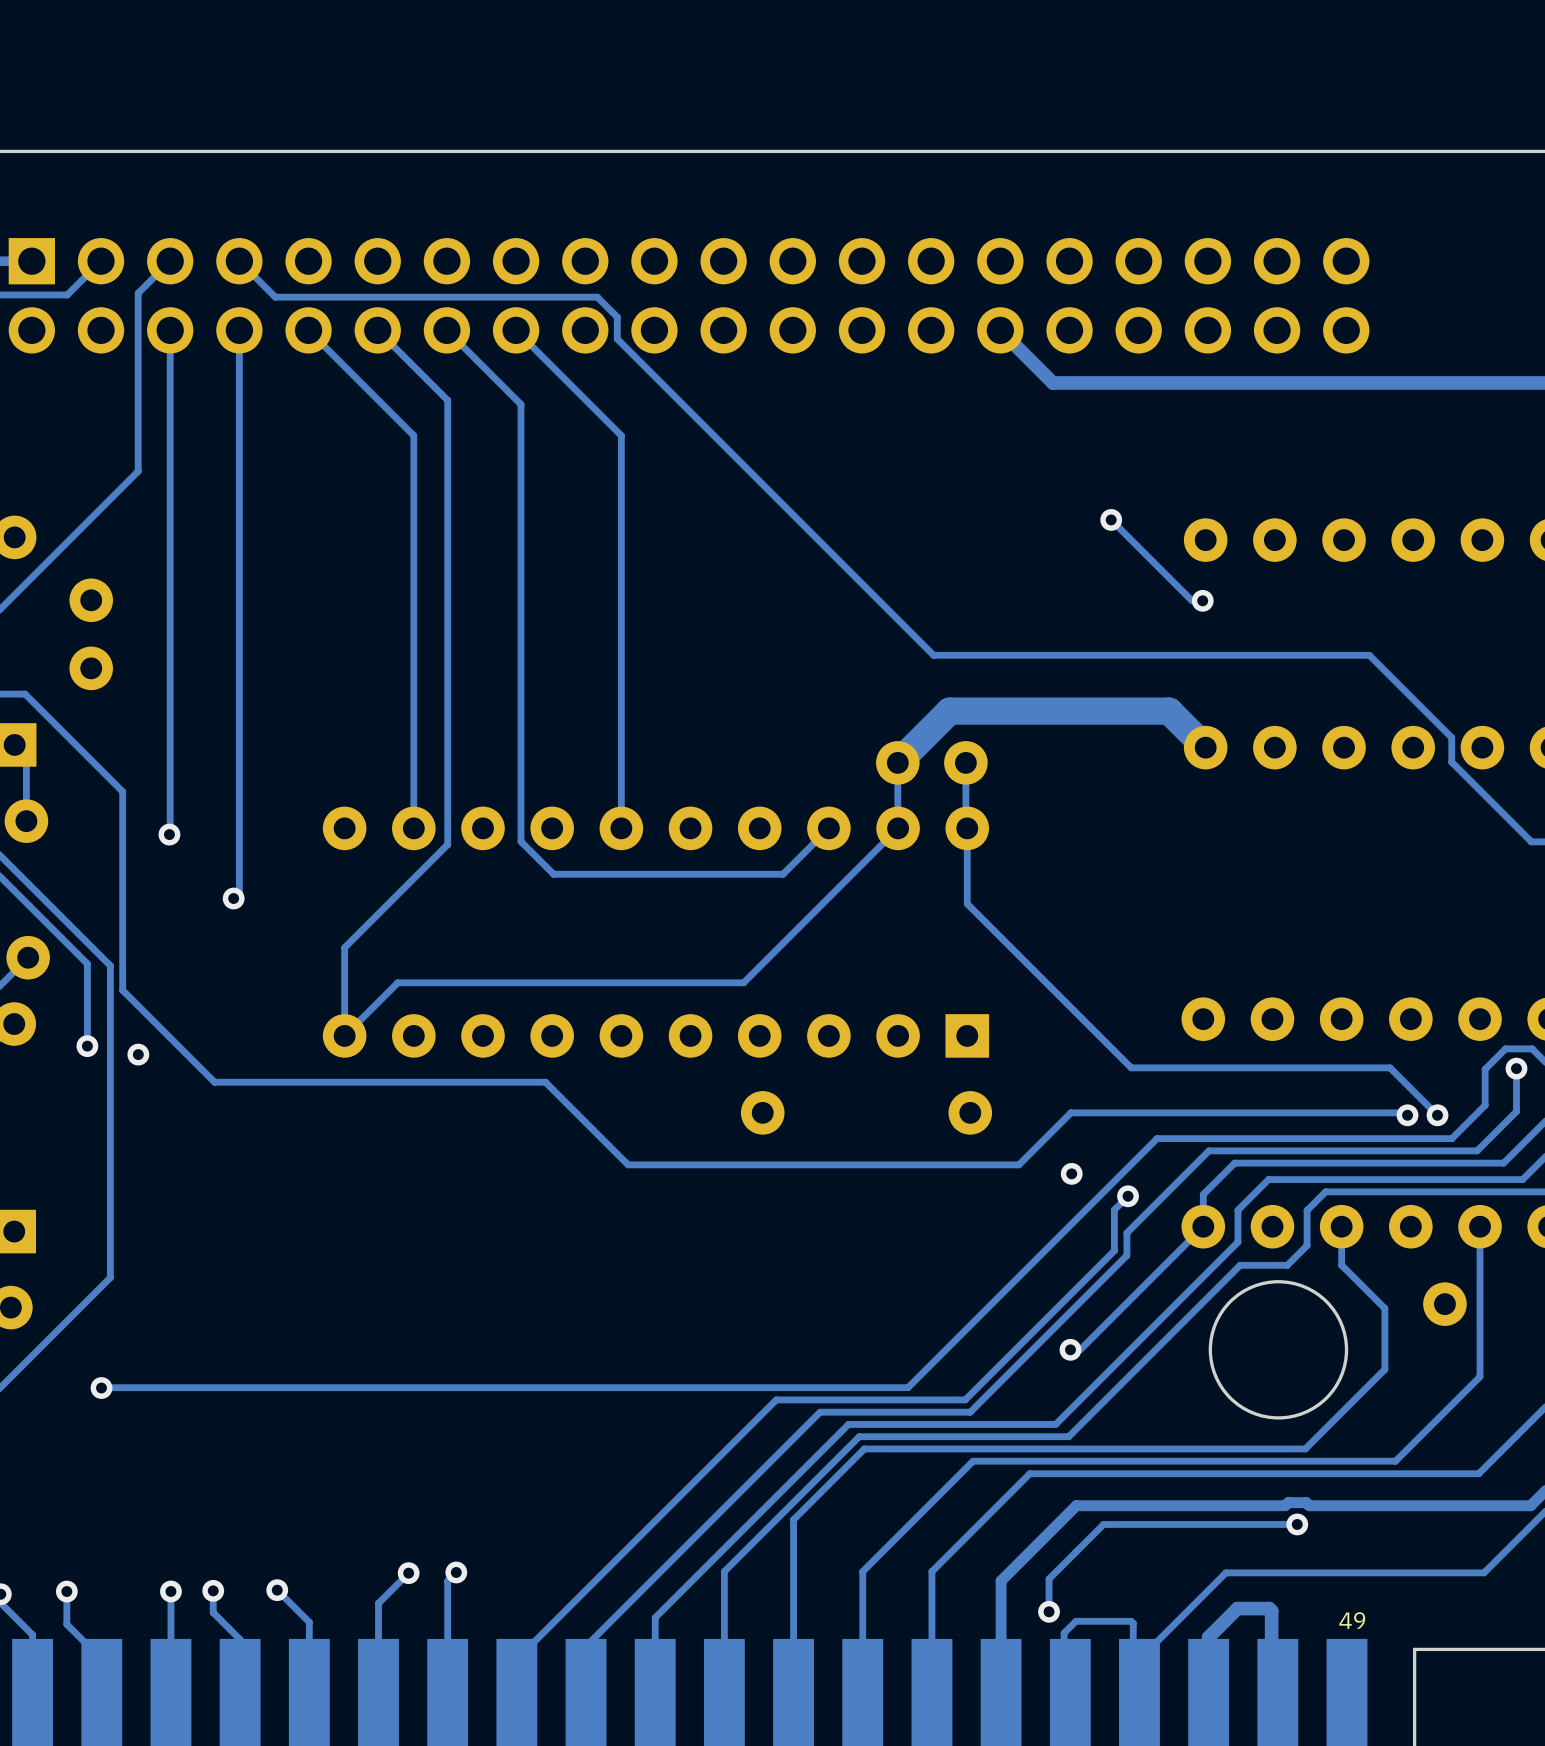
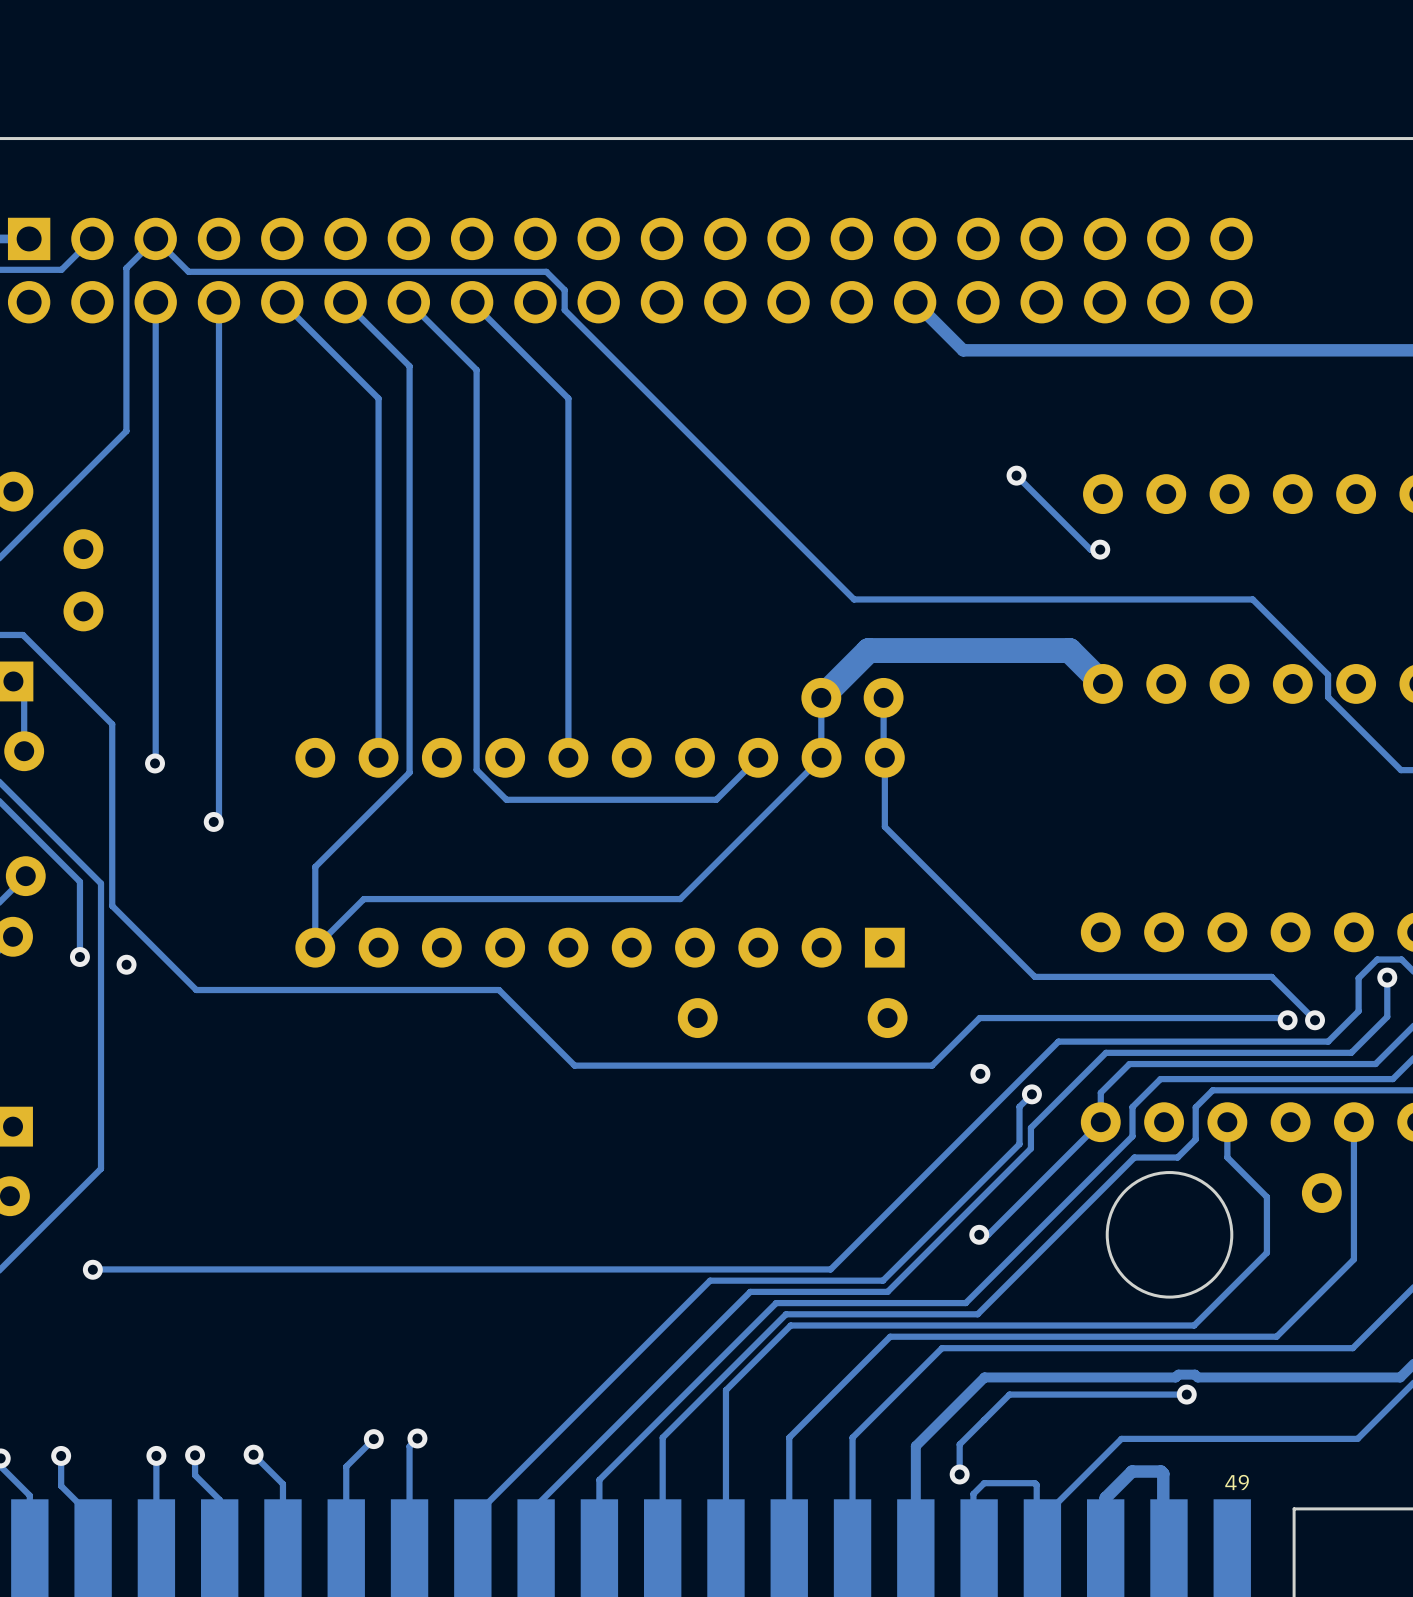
track: (239, 261) (275, 297) -> (155, 238) (188, 271) (251, 271)

